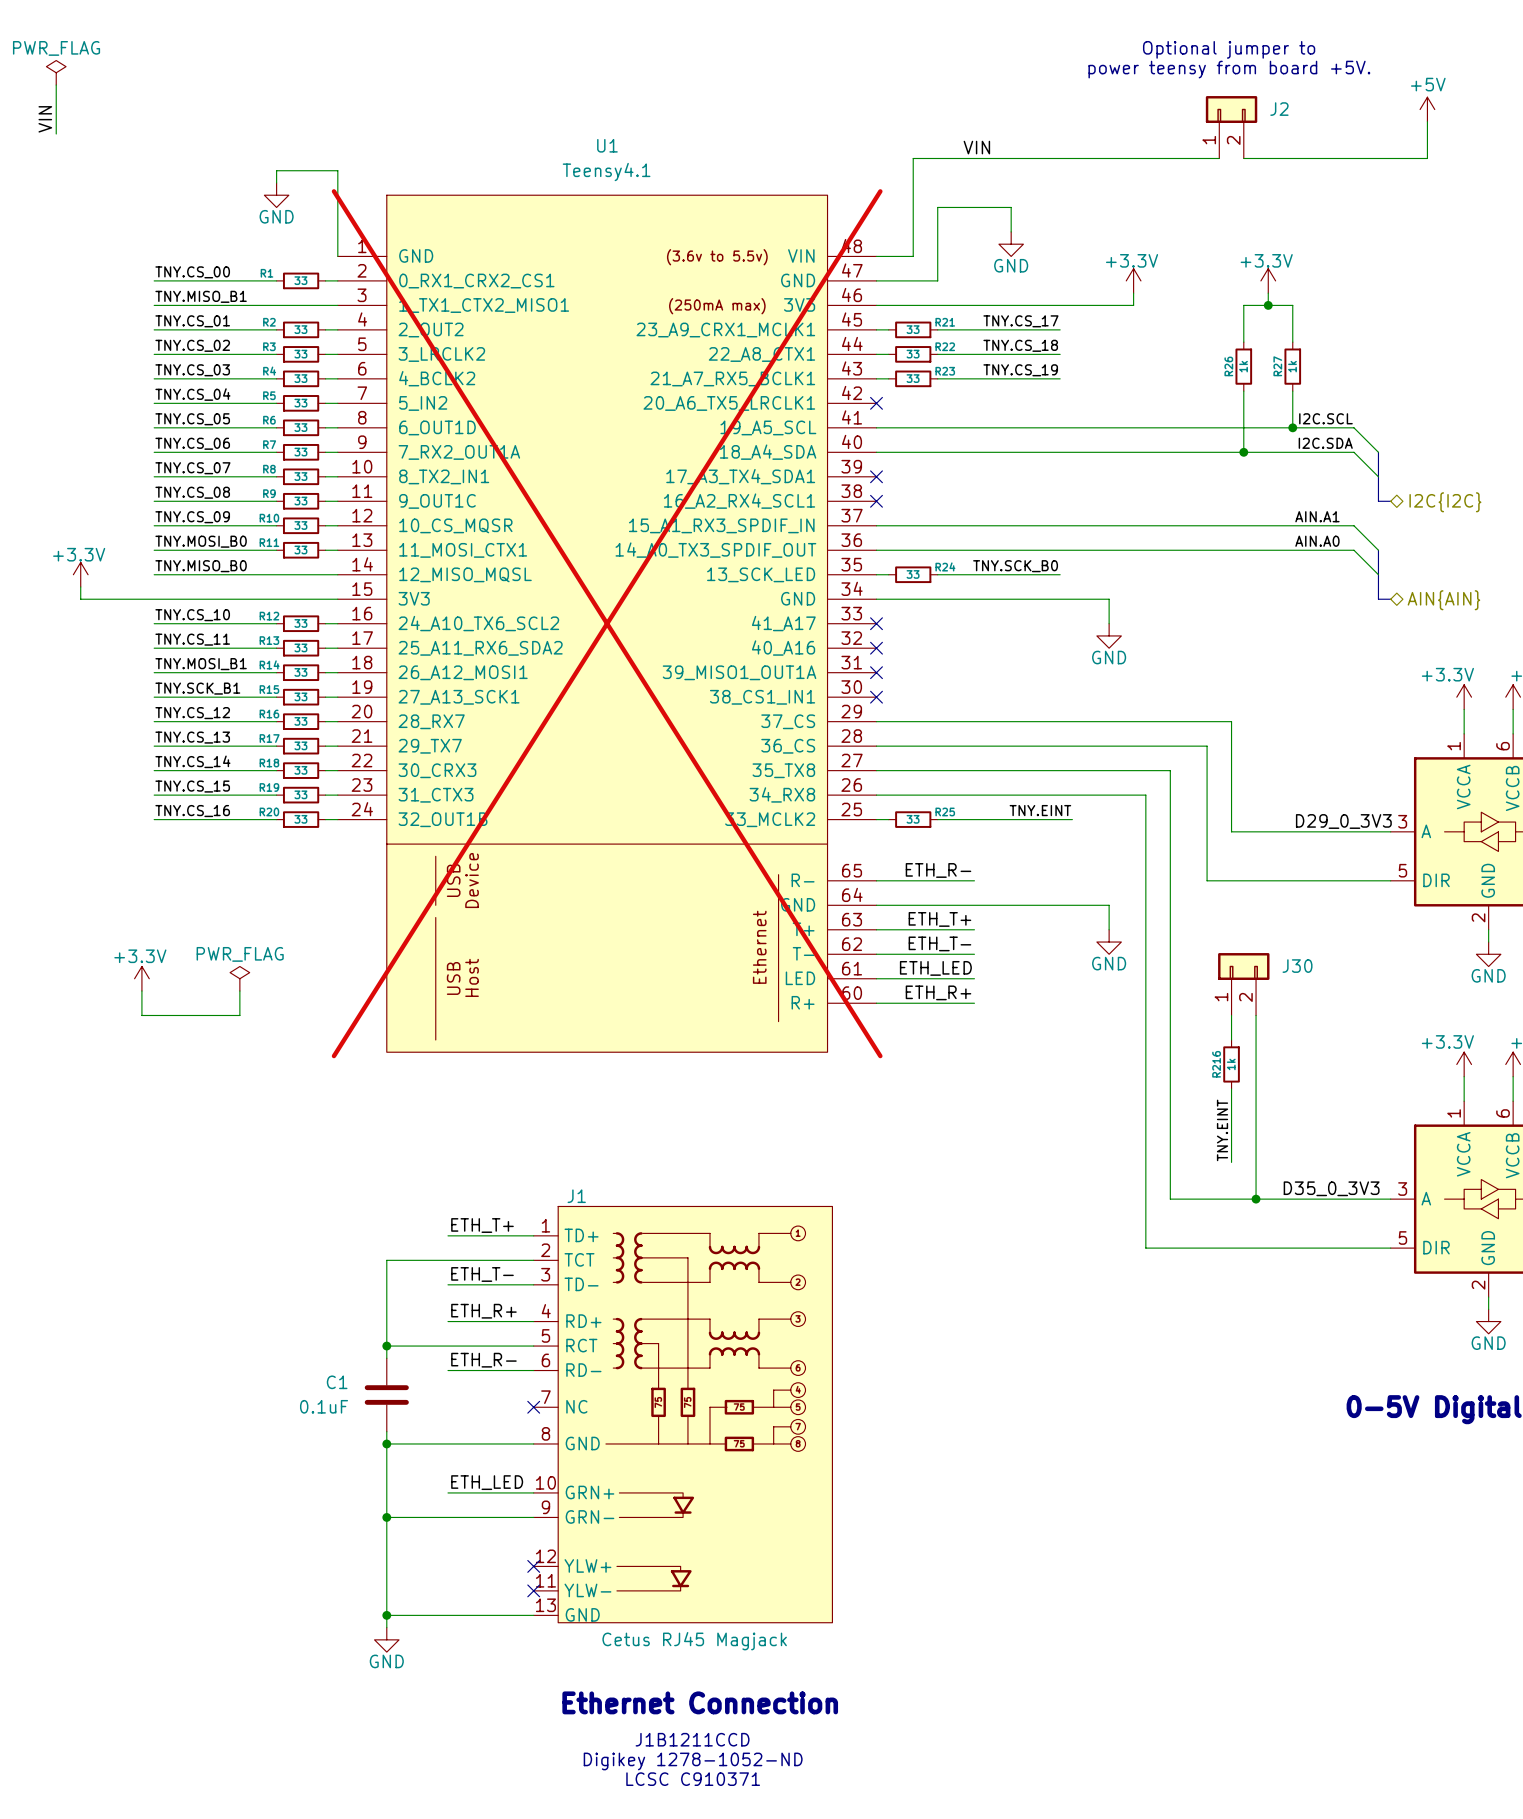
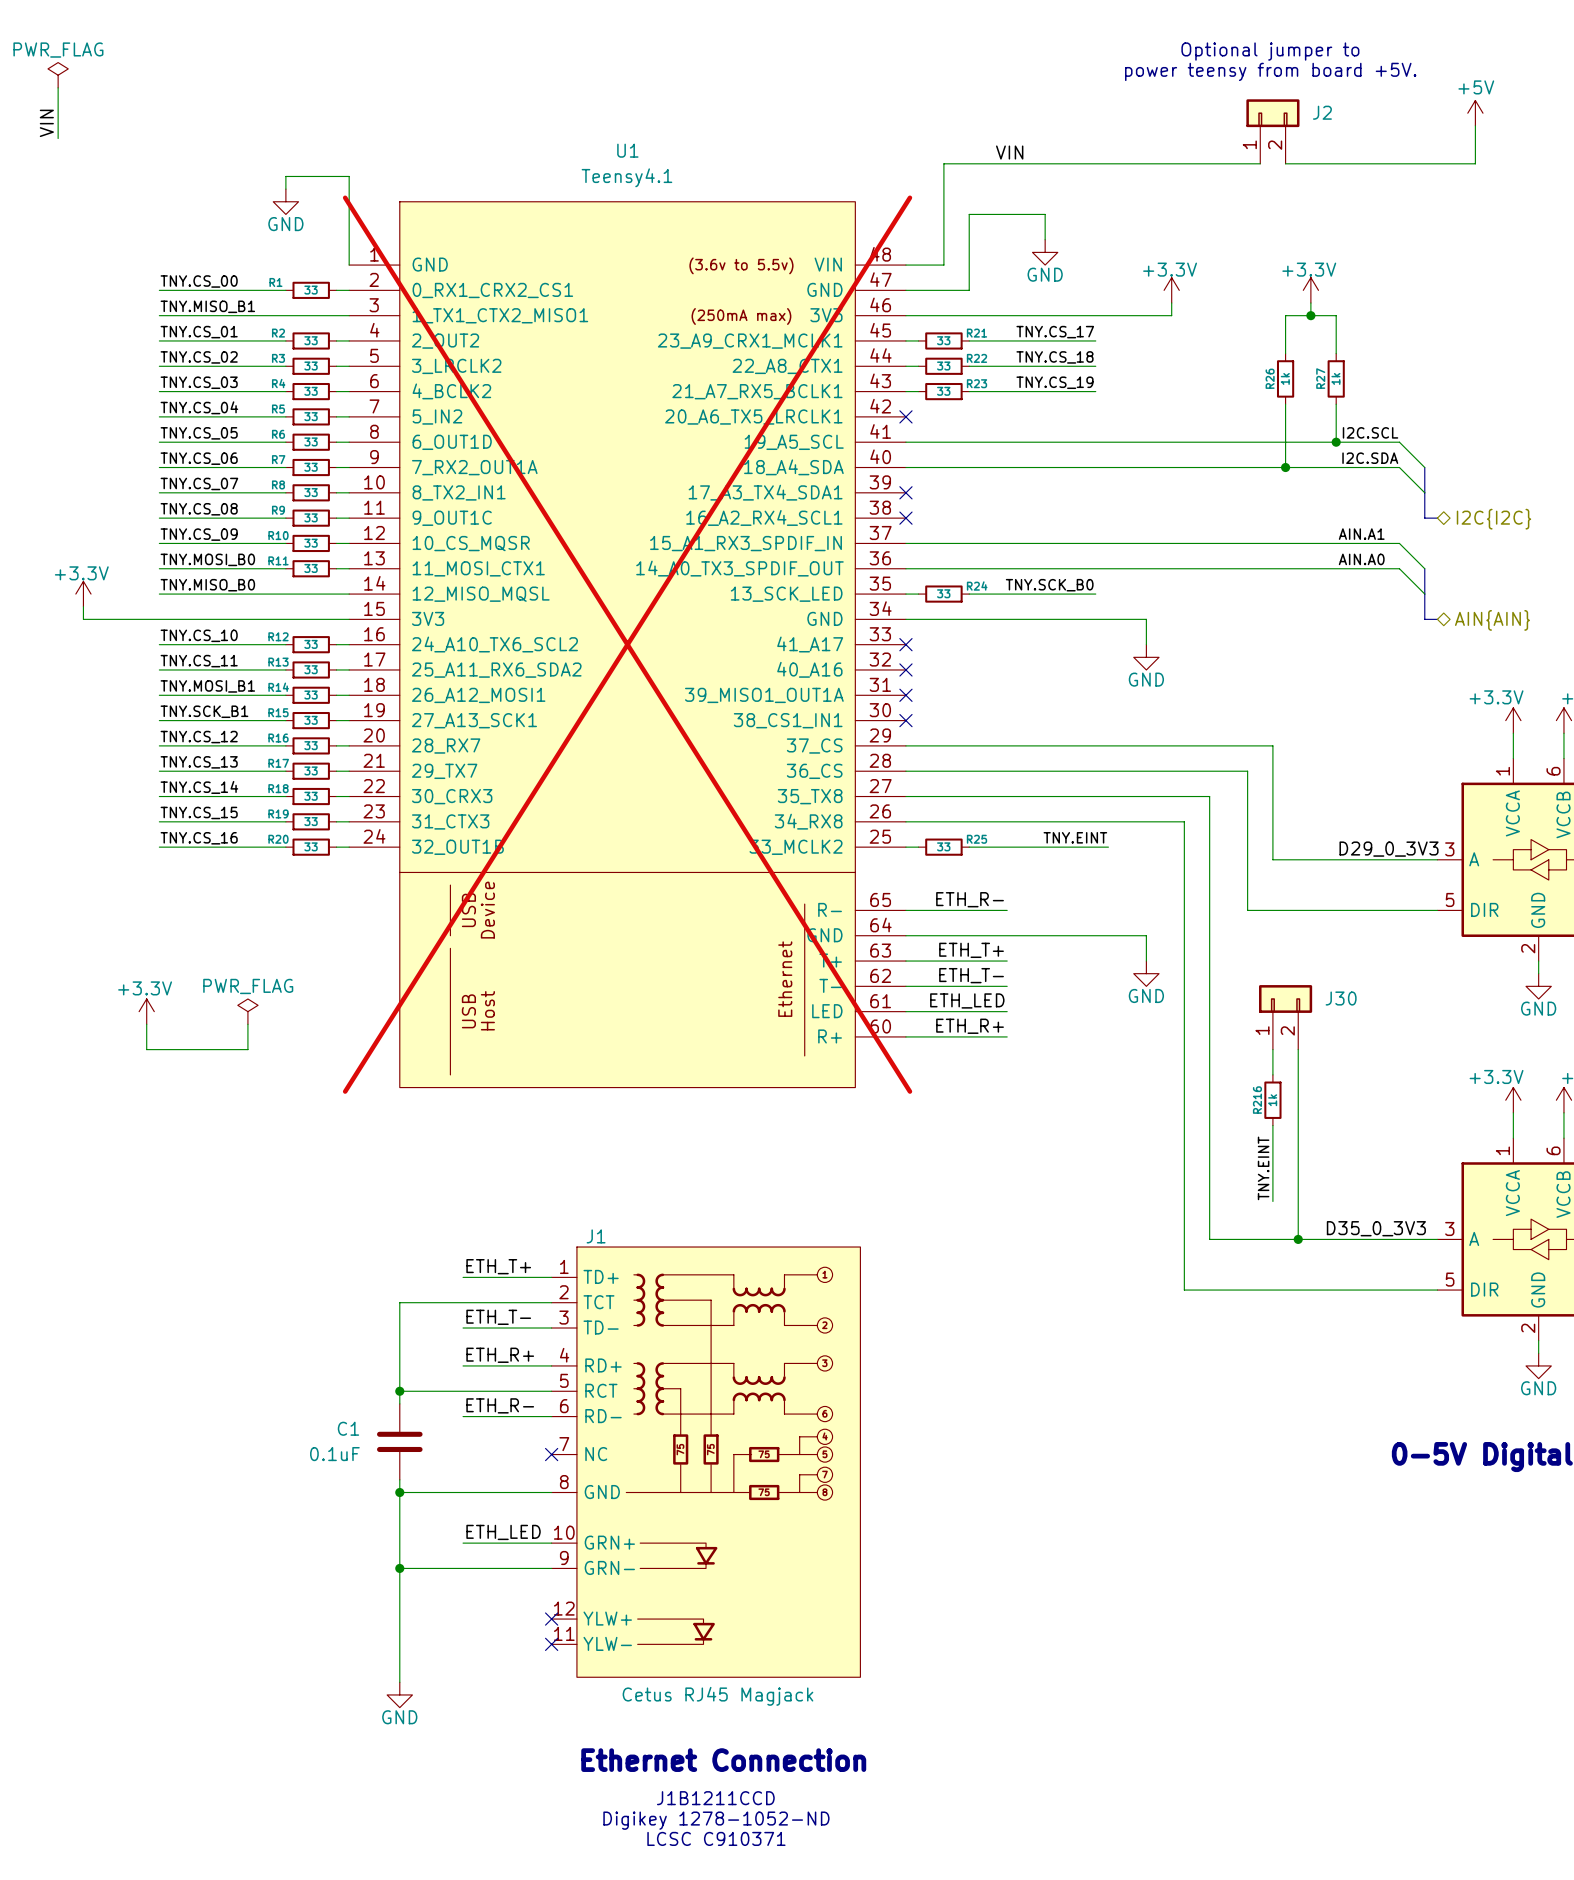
J1 symbol: [533, 1206, 833, 1623] -> [551, 1247, 861, 1678]
wire: (386, 1615) (533, 1615) -> none
junction: (386, 1615) -> none

